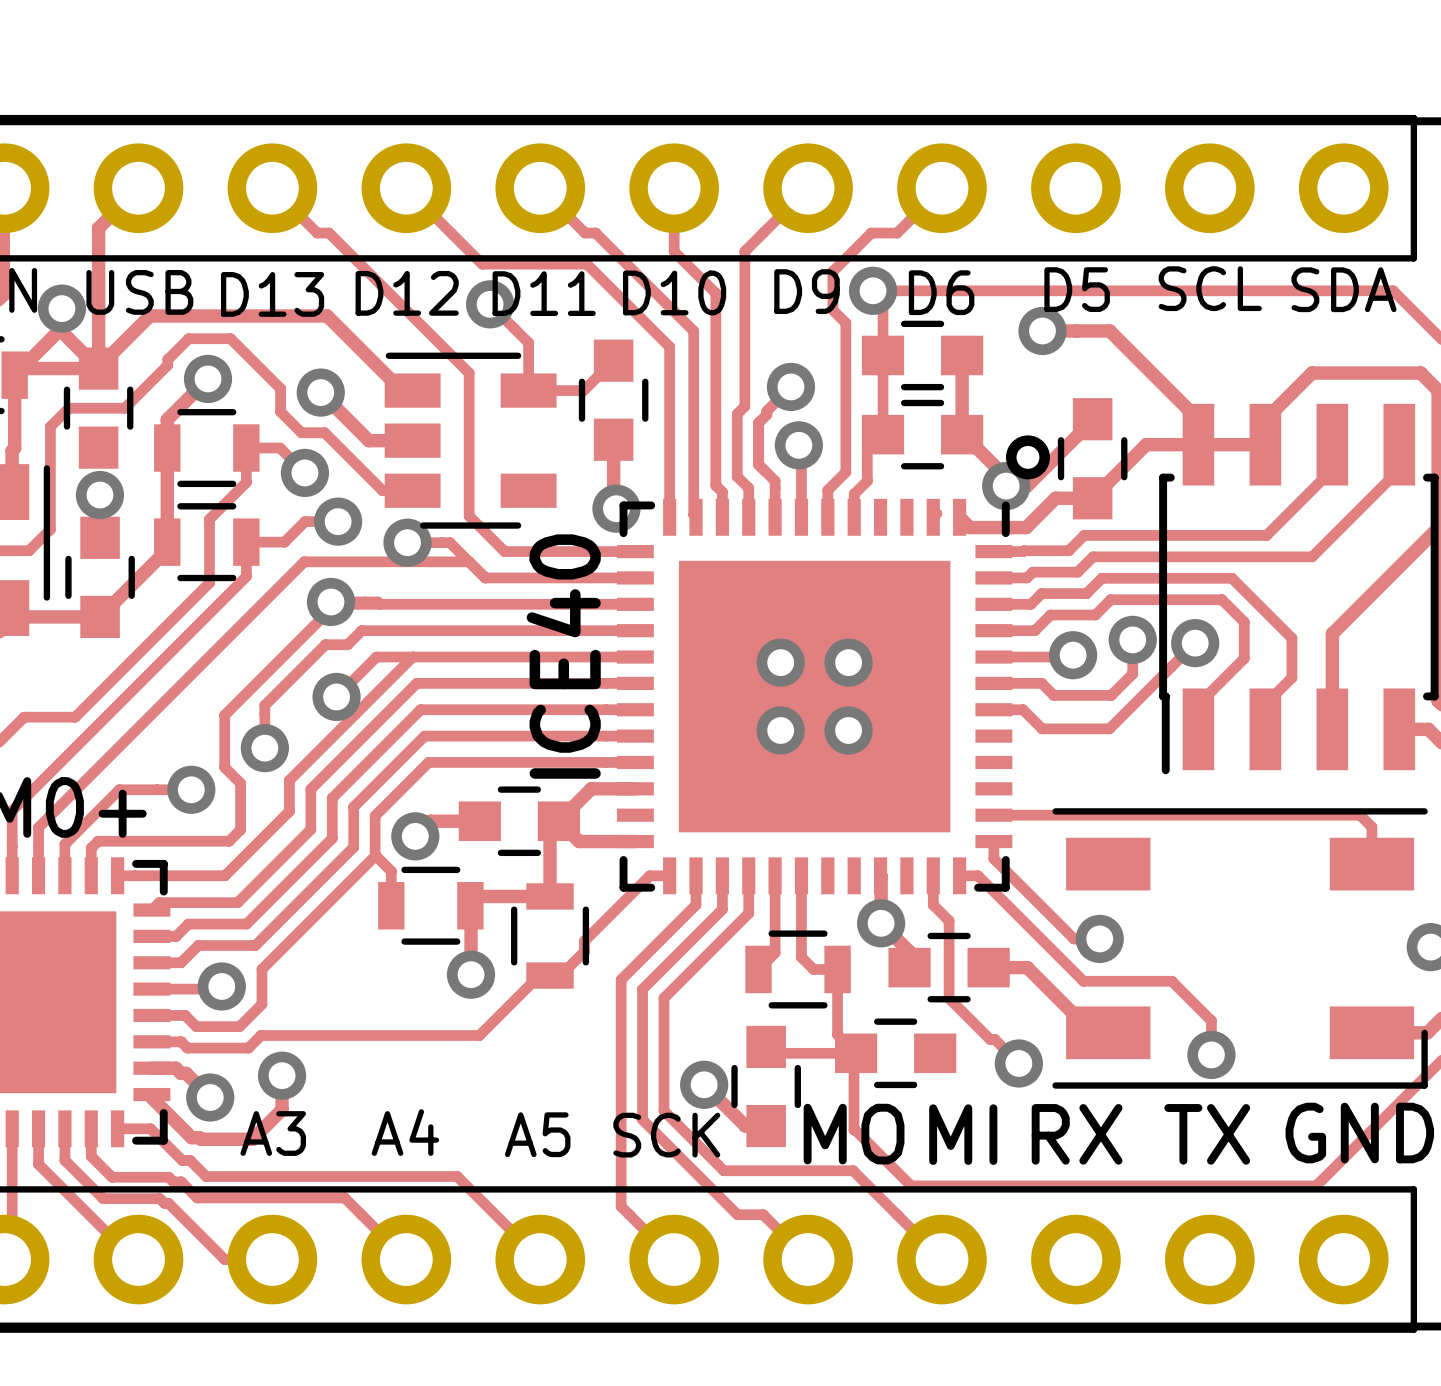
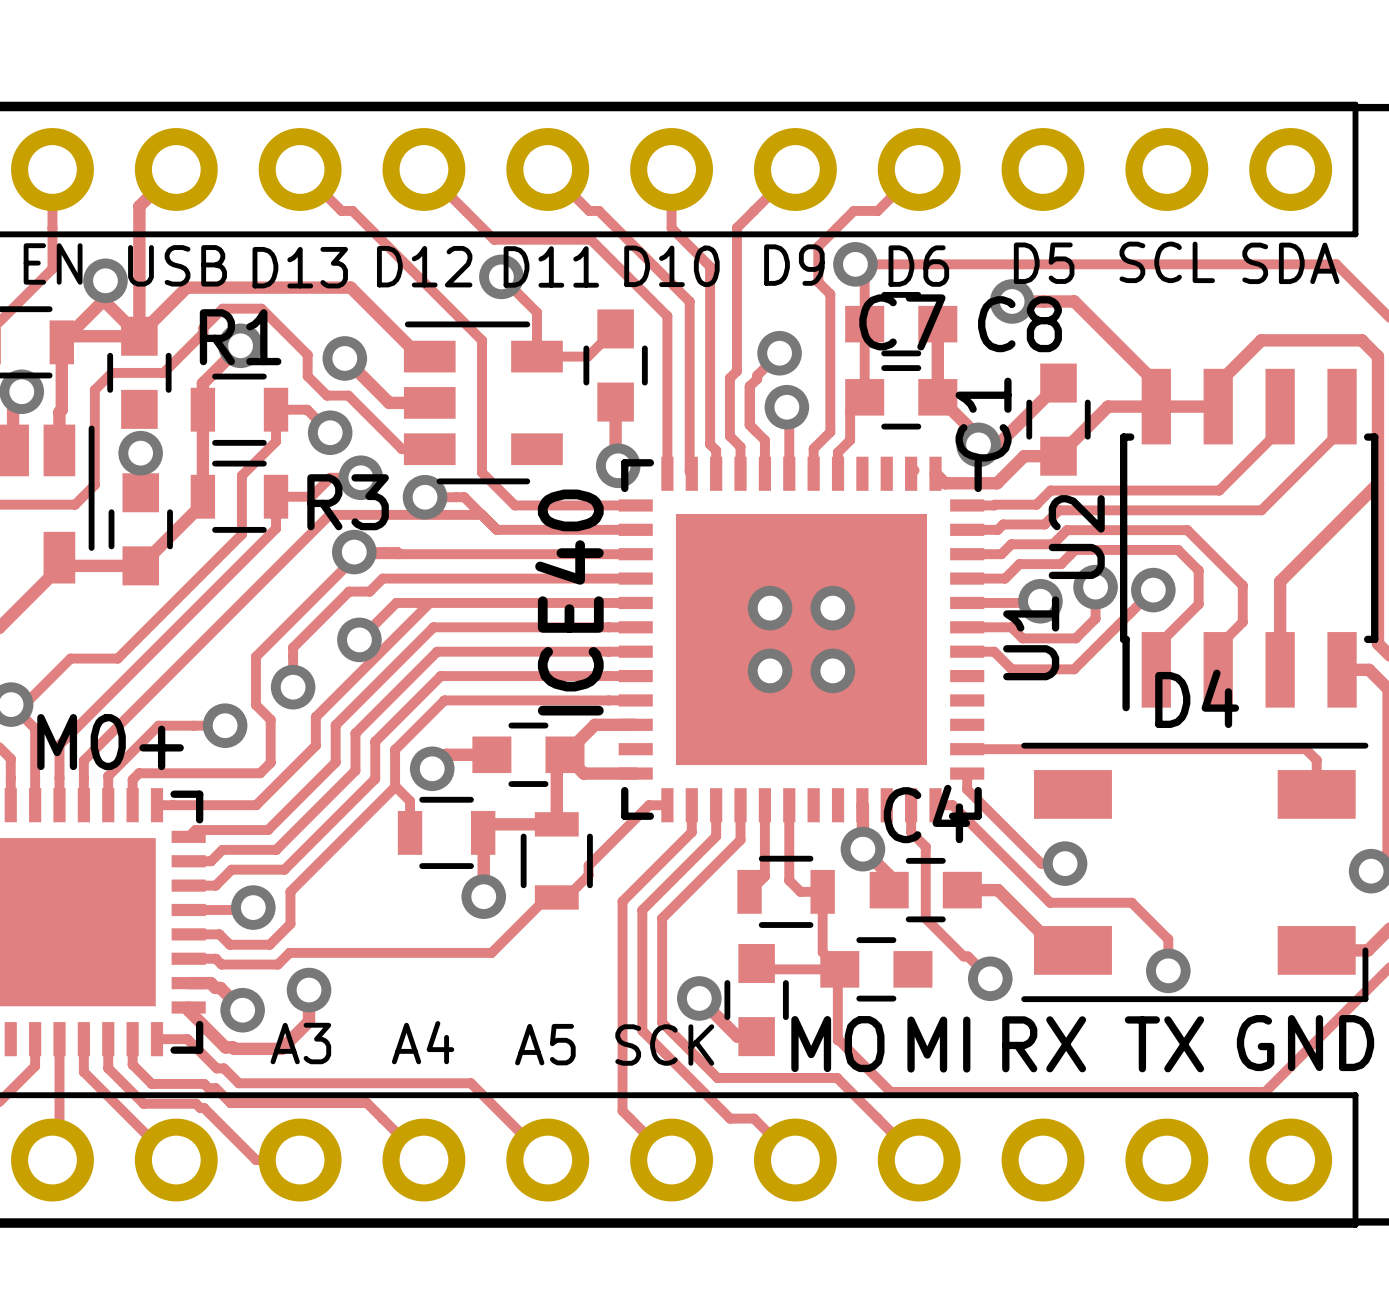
C7 name: none -> C7 (902, 322)
C8 name: none -> C8 (1019, 324)
R1 name: none -> R1 (240, 337)
drawing: [1005, 435, 1050, 480] -> none
C1 name: none -> C1 (983, 419)
R3 name: none -> R3 (348, 502)
U2 name: none -> U2 (1076, 537)
U1 name: none -> U1 (1031, 638)
D4 name: none -> D4 (1197, 698)
C4 name: none -> C4 (926, 814)

